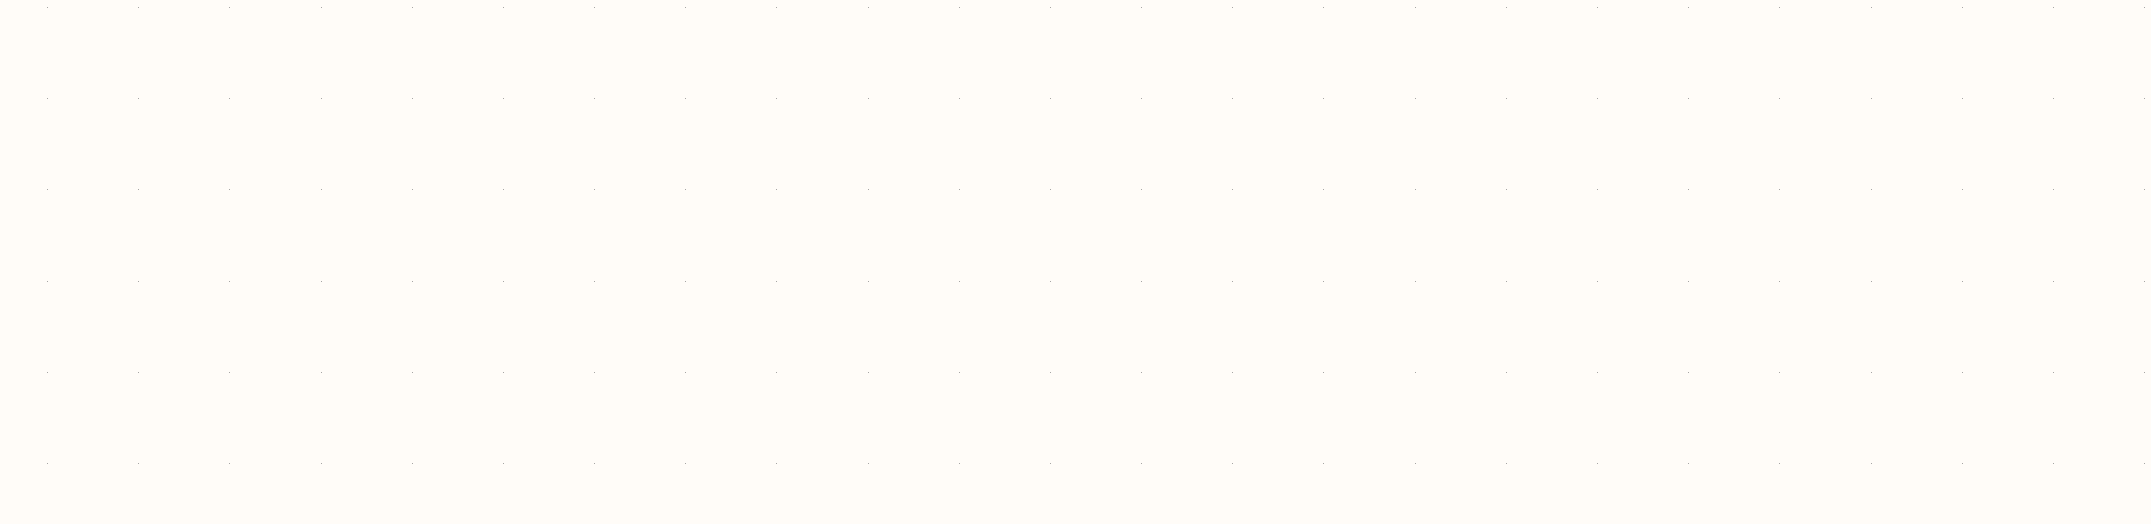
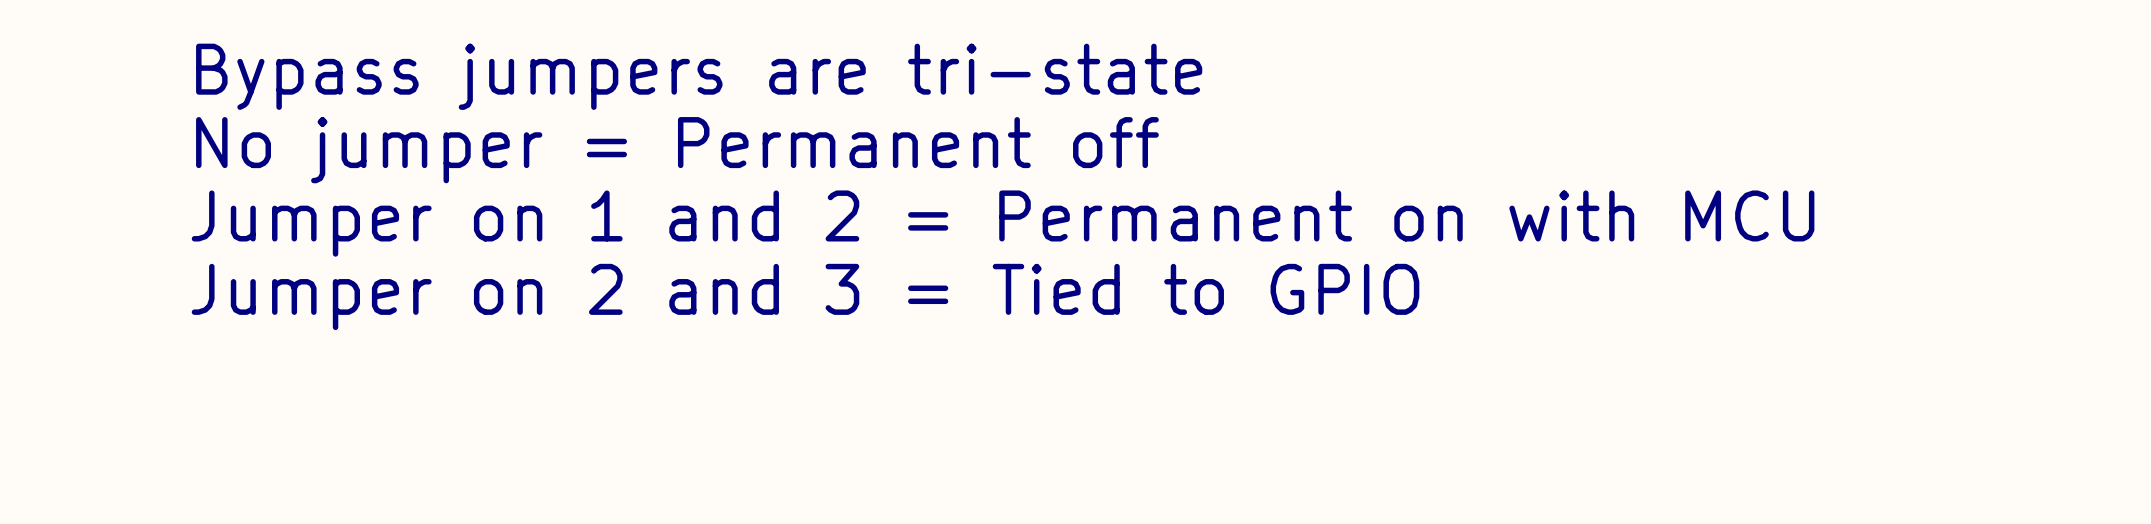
text: none -> Bypass jumpers are tri-state (699, 76)
text: none -> No jumper = Permanent off (677, 150)
text: none -> Jumper on 1 and 2 = Permanent on with MCU (1003, 223)
text: none -> Jumper on 2 and 3 = Tied to GPIO (805, 296)

